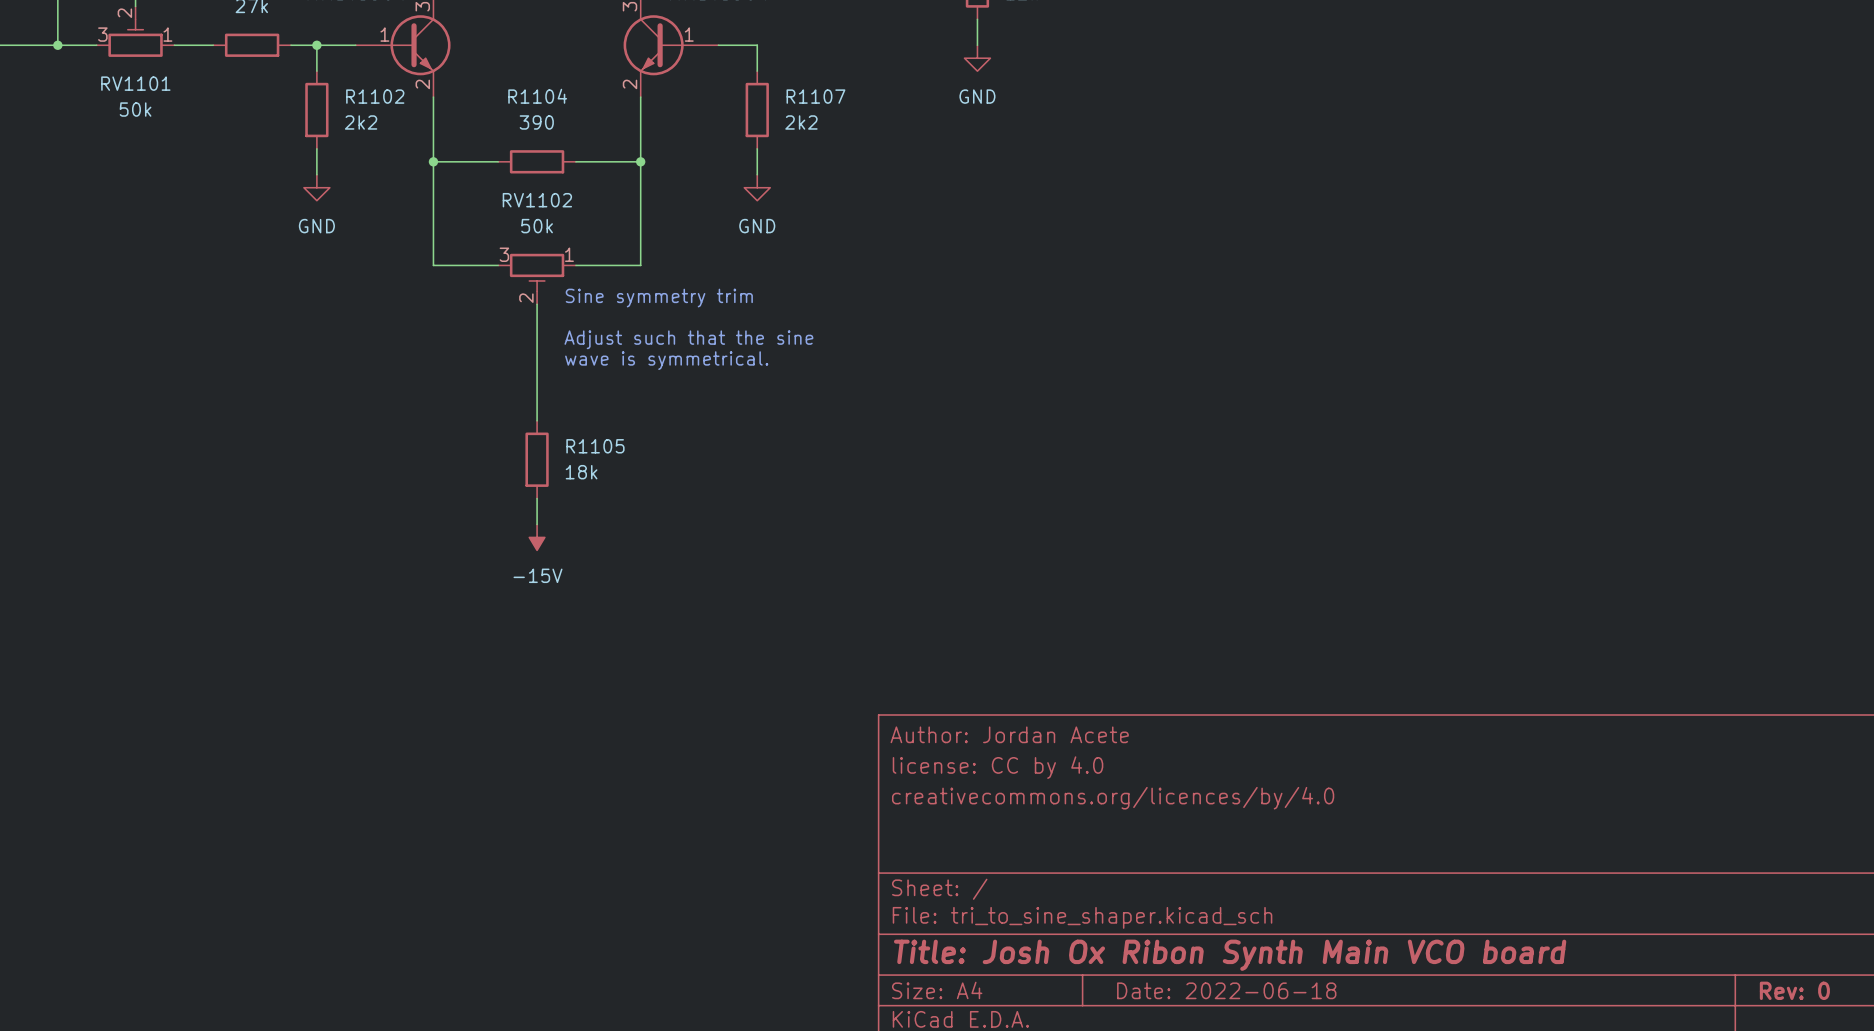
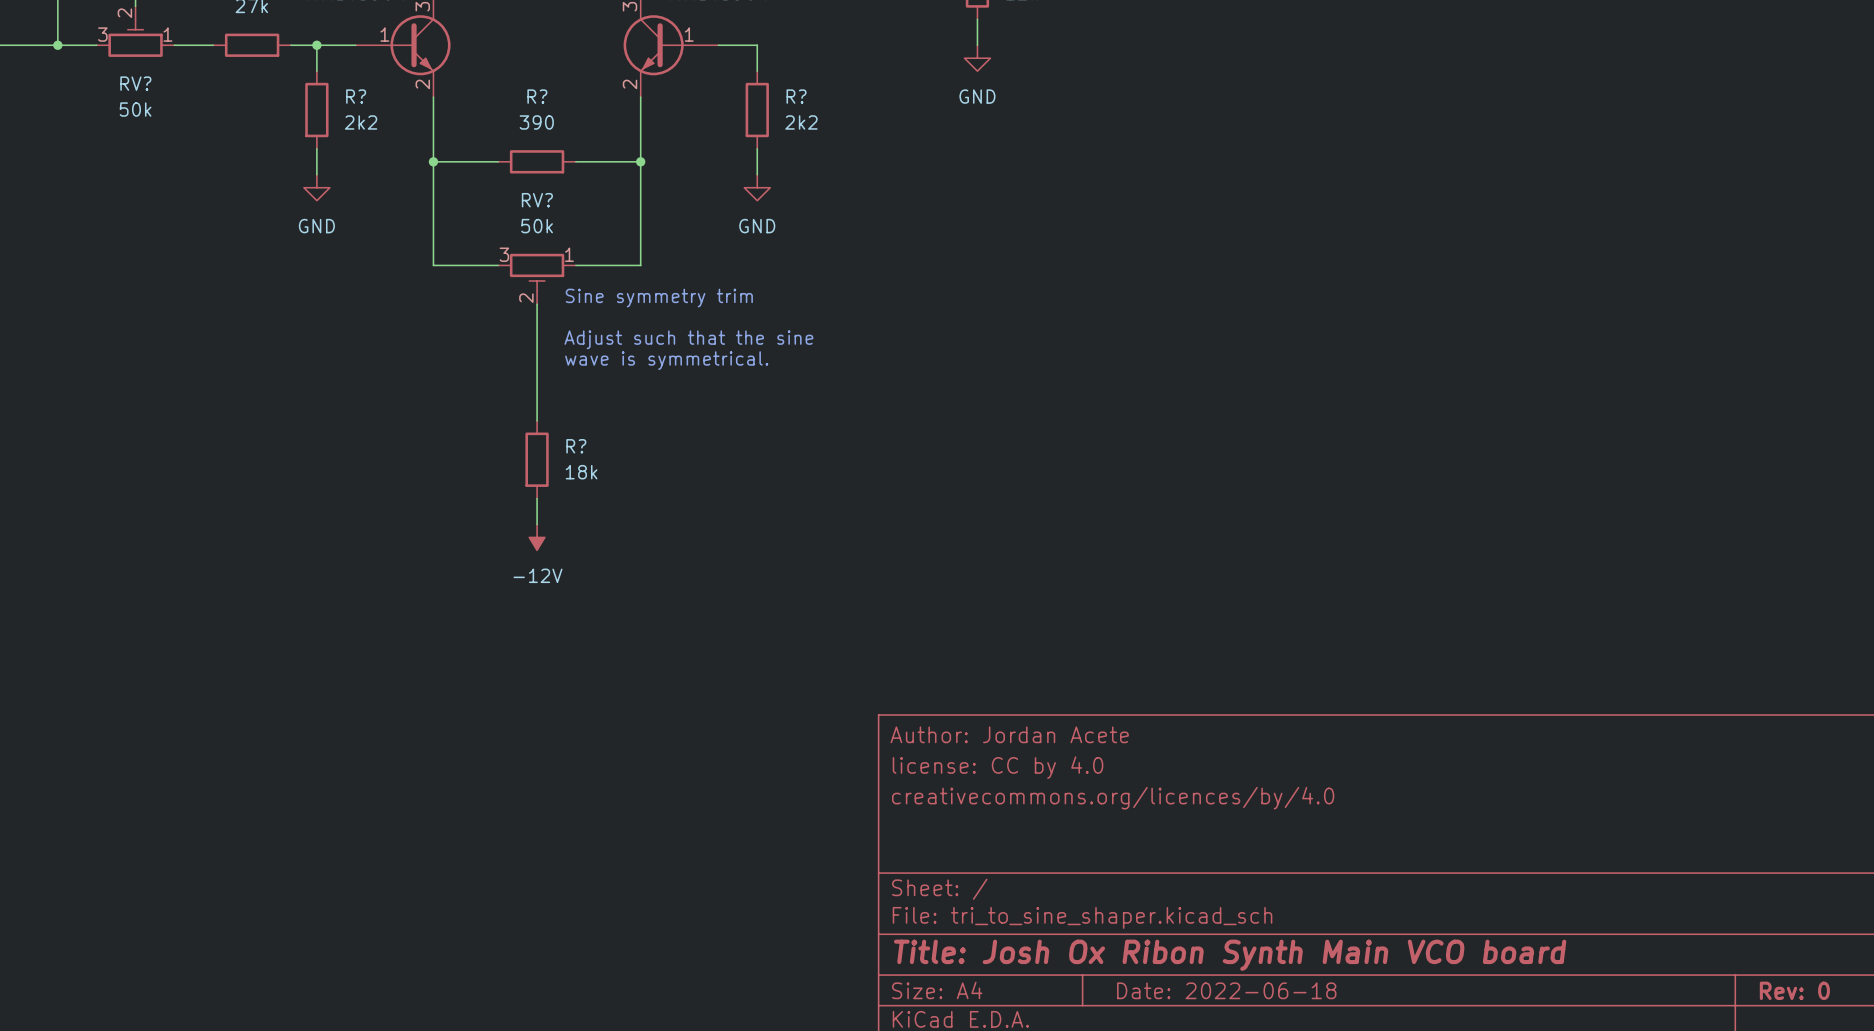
RV1101 name: RV1101 (135, 83) -> RV? (135, 83)
R1102 name: R1102 (375, 96) -> R? (356, 96)
R1104 name: R1104 (537, 96) -> R? (537, 96)
R1107 name: R1107 (815, 96) -> R? (796, 96)
RV1102 name: RV1102 (537, 200) -> RV? (537, 200)
R1105 name: R1105 (595, 446) -> R? (576, 446)
power symbol: -15V (537, 537) -> -12V (537, 537)

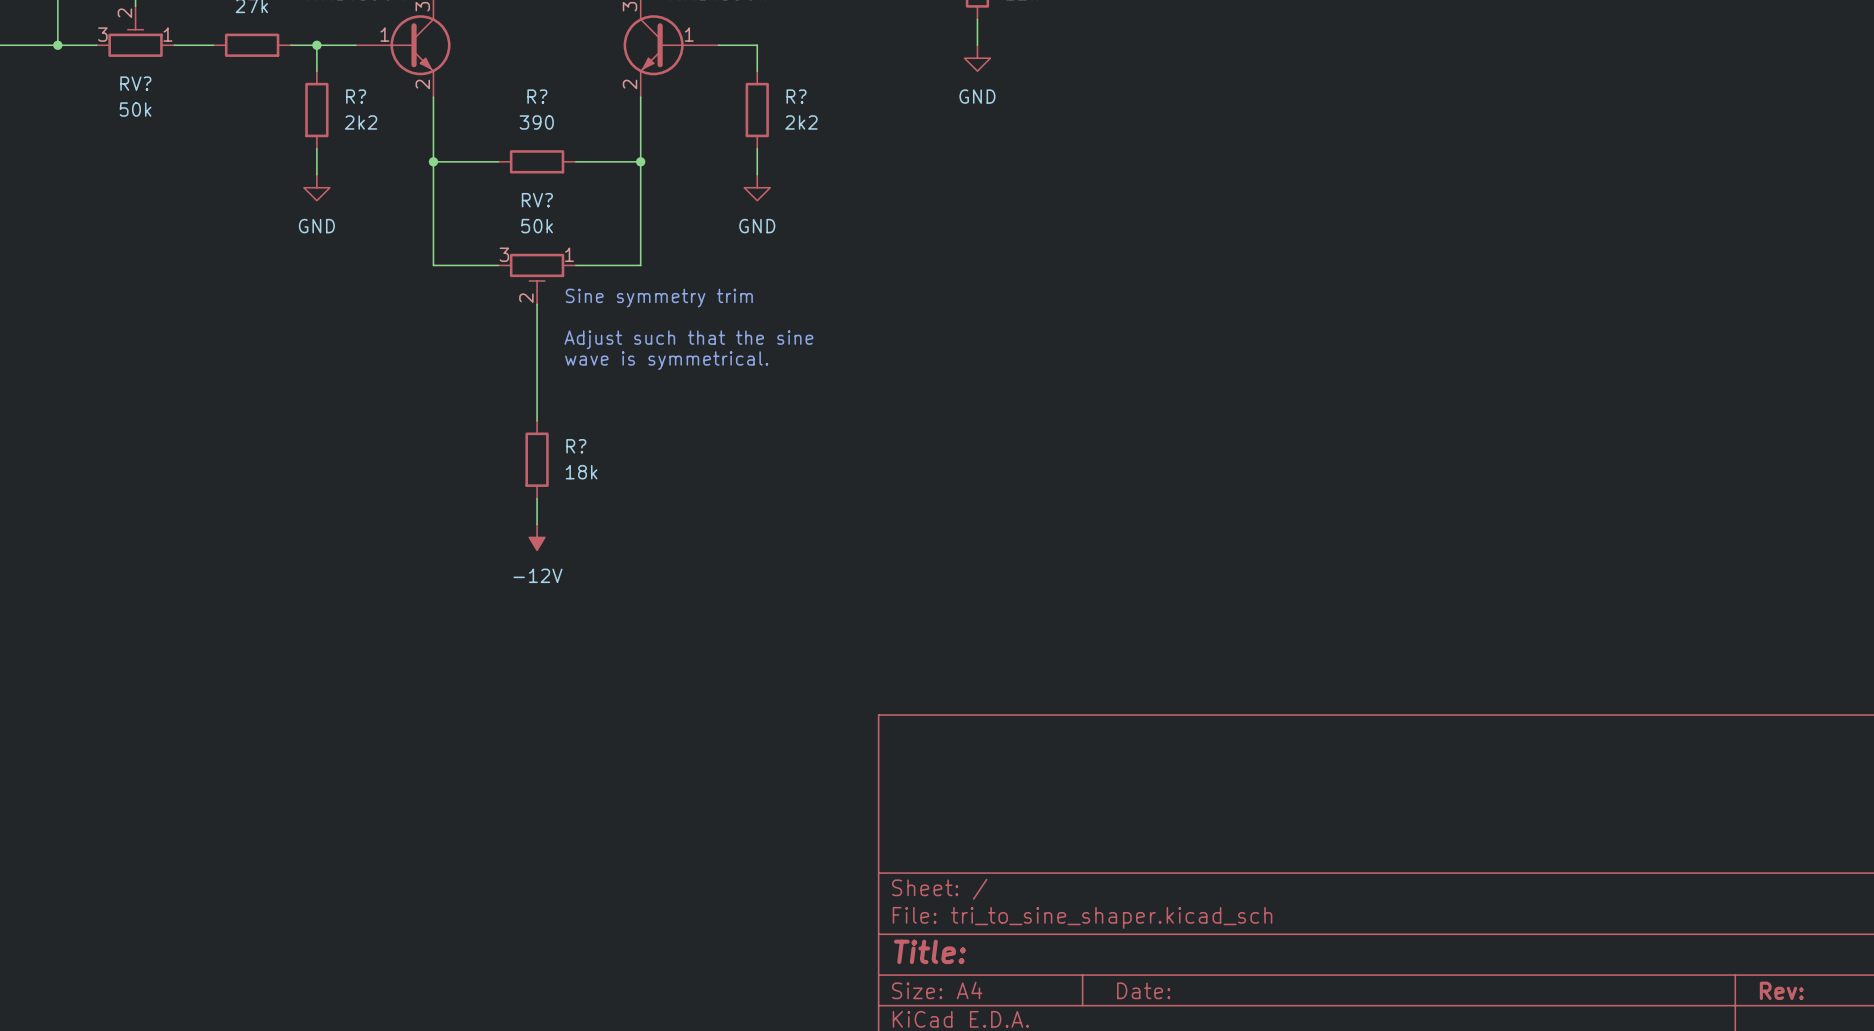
title block: Author: Jordan Acete (1009, 734) -> none
title block: license: CC by 4.0 (998, 767) -> none
title block: creativecommons.org/licences/by/4.0 (1113, 798) -> none
title block: Title: Josh Ox Ribon Synth Main VCO board (1230, 955) -> Title: (929, 951)
title block: Date: 2022-06-18 (1226, 990) -> Date: (1143, 990)
title block: Rev: 0 (1794, 990) -> Rev: (1781, 990)

